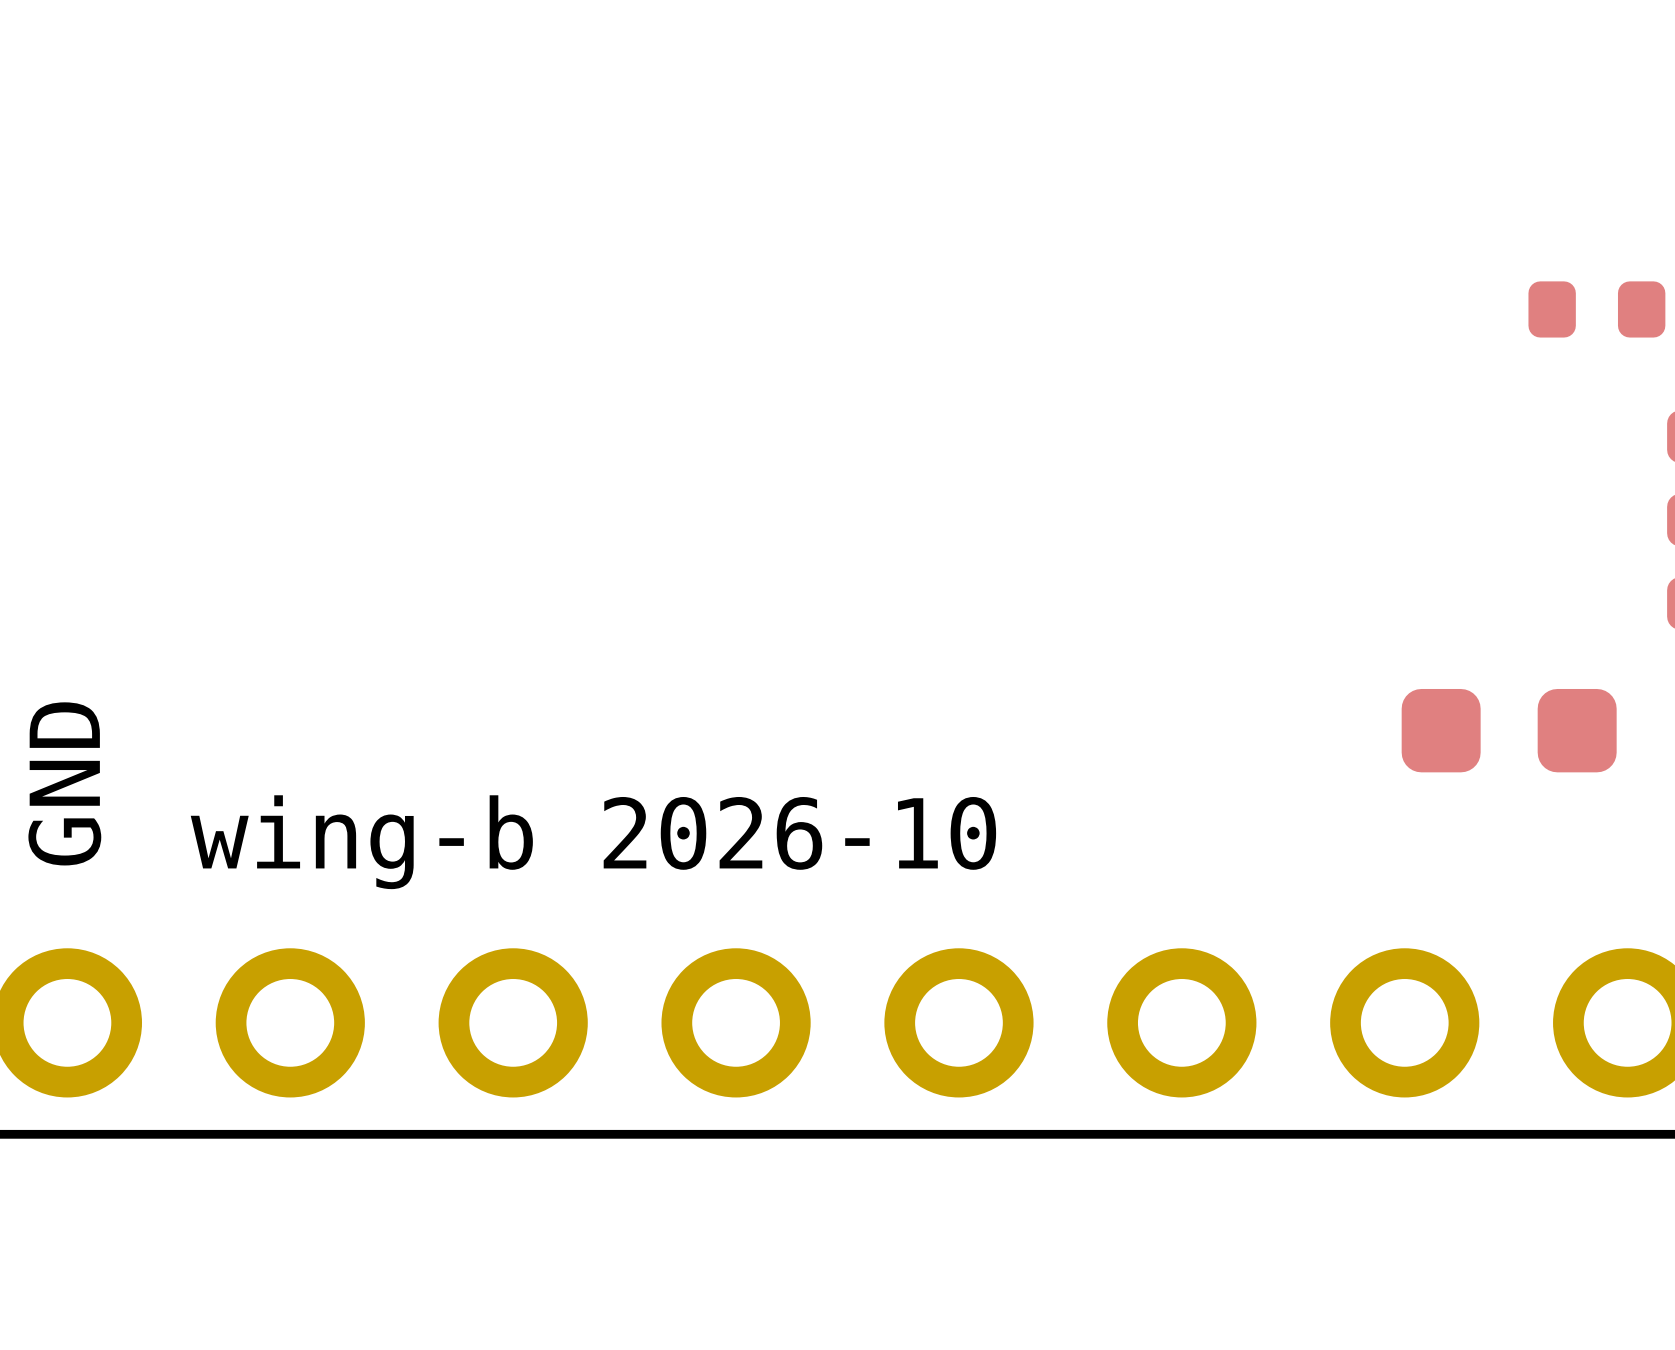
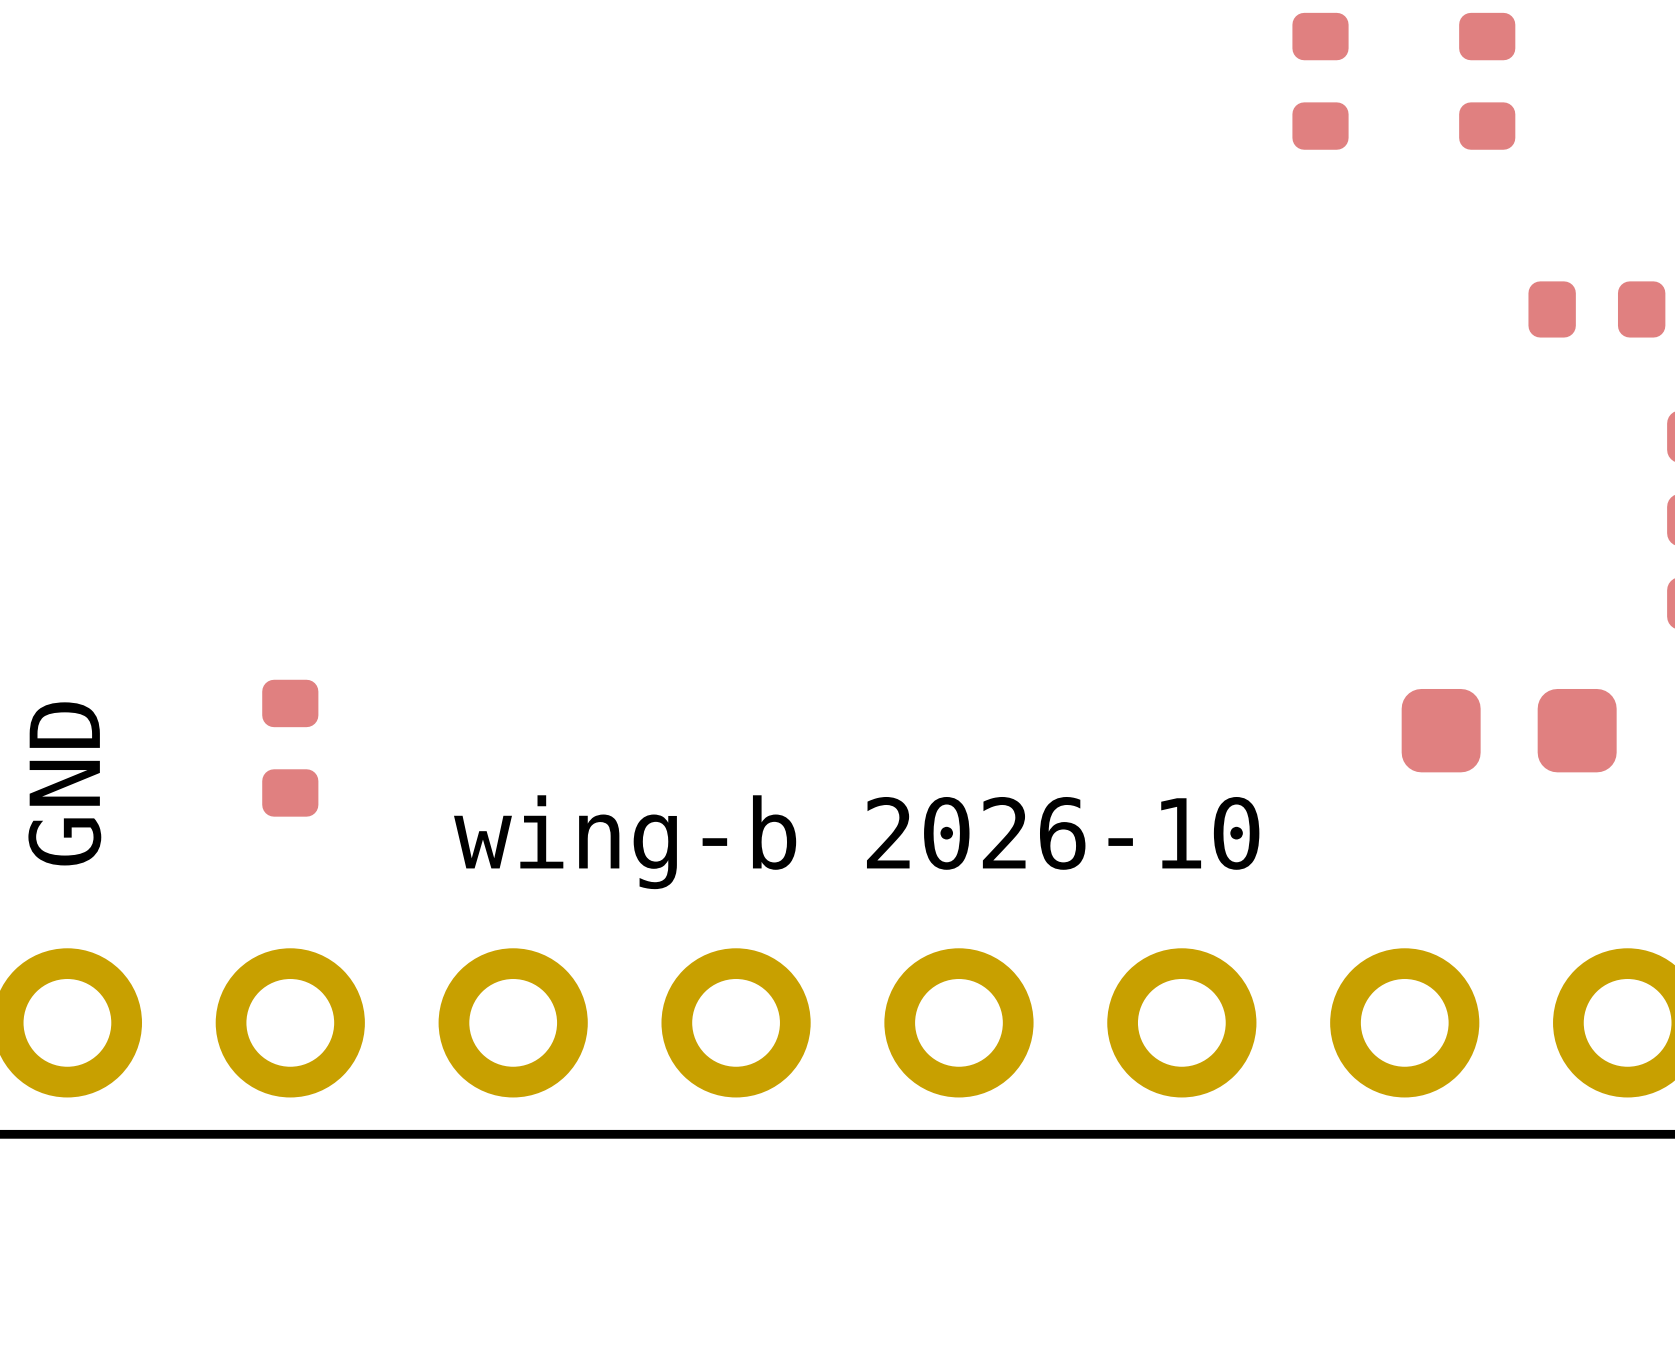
part: none -> (1320, 81)
part: none -> (1487, 81)
part: none -> (290, 748)
text position: wing-b 2026-10 (593, 842) -> wing-b 2026-10 (856, 842)

